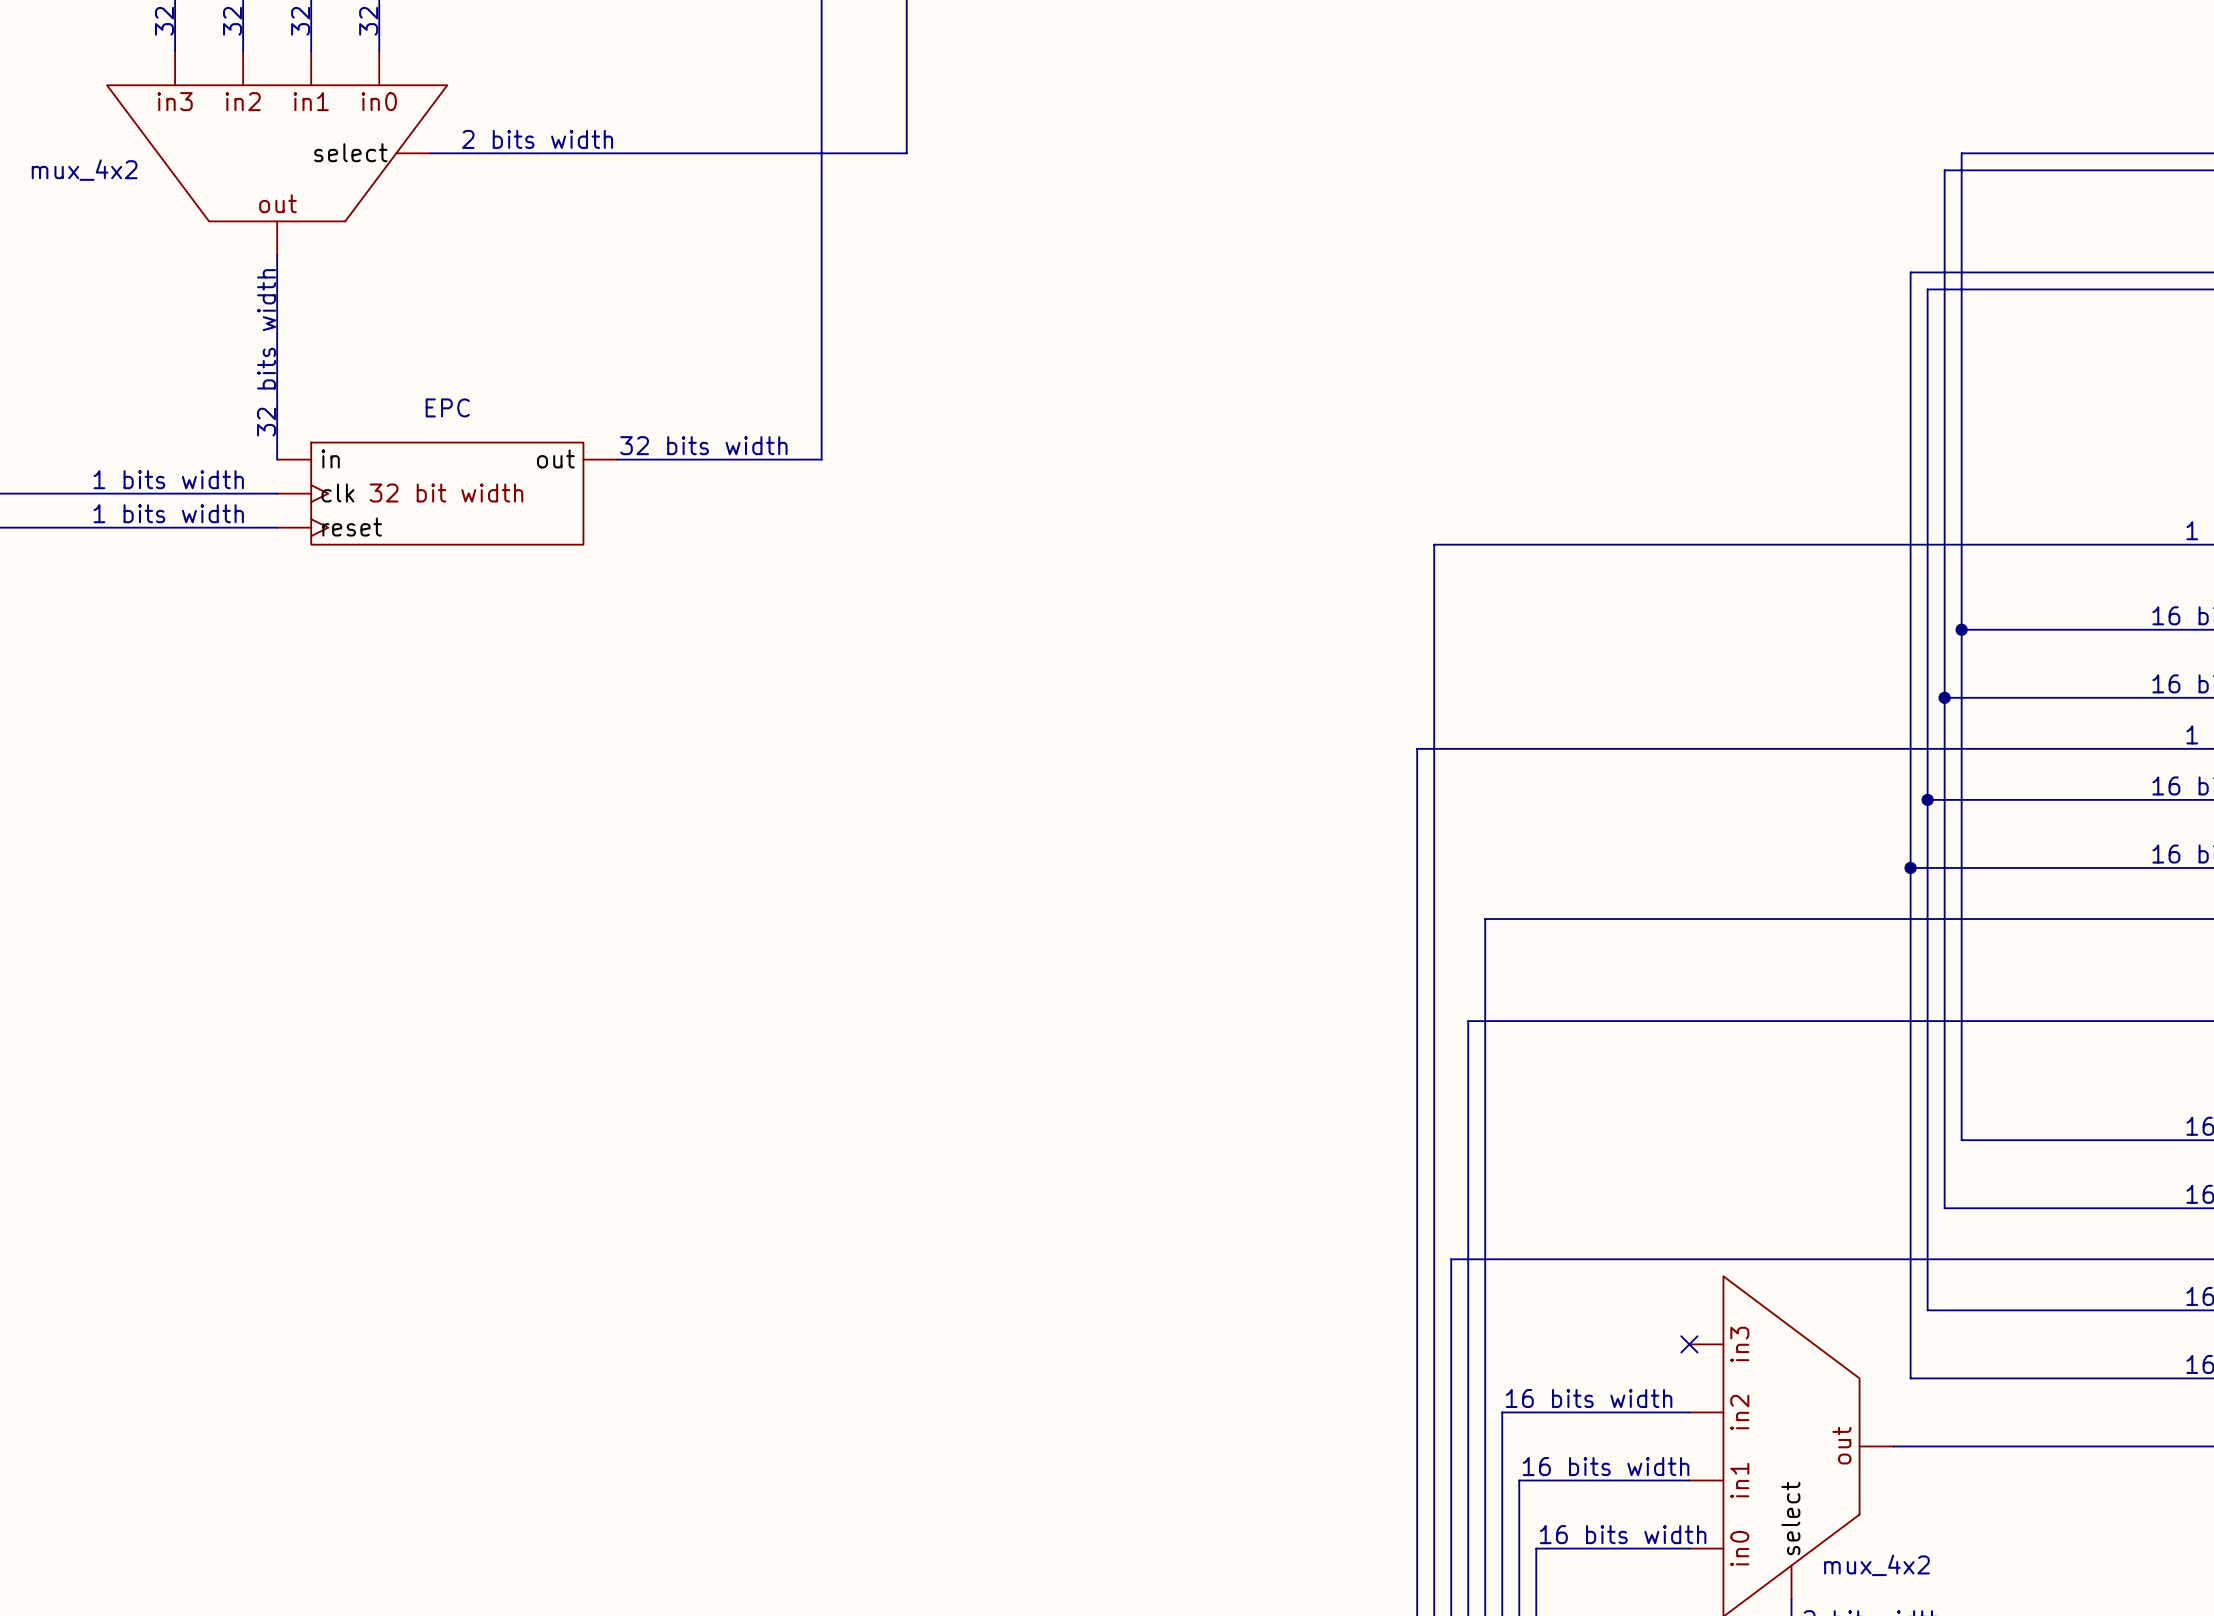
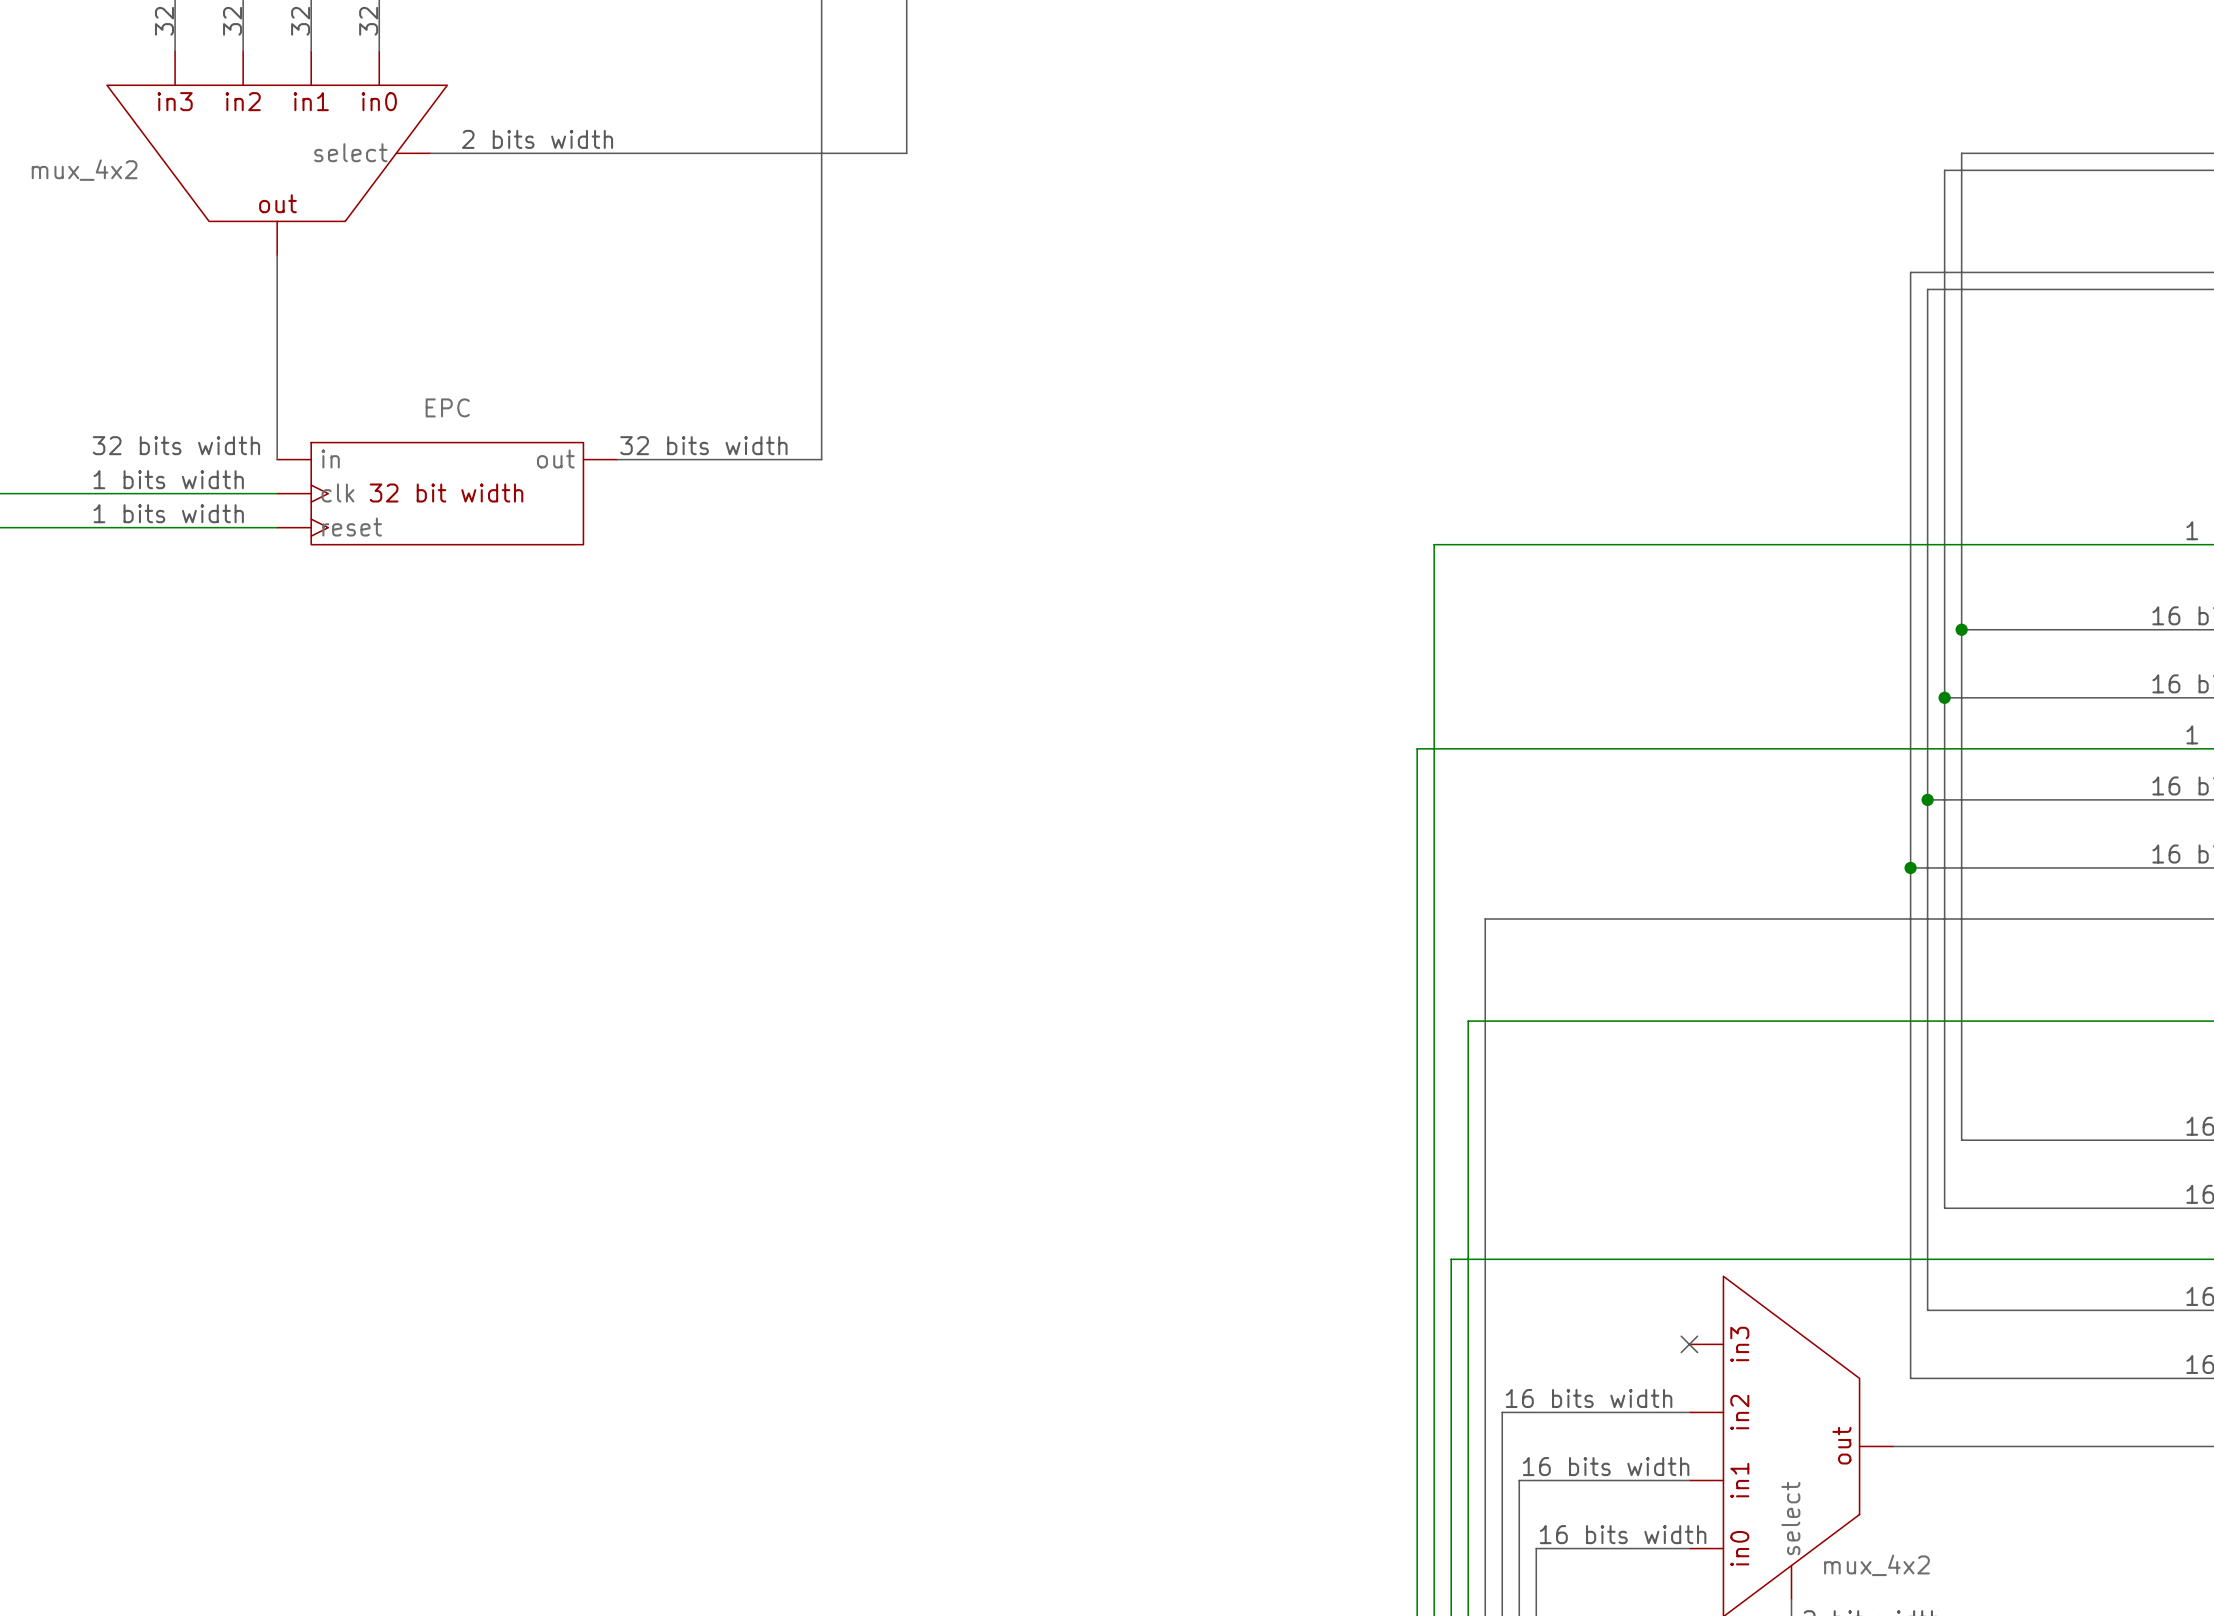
text rotation: 0° (266, 352) -> 90° clockwise (176, 445)

